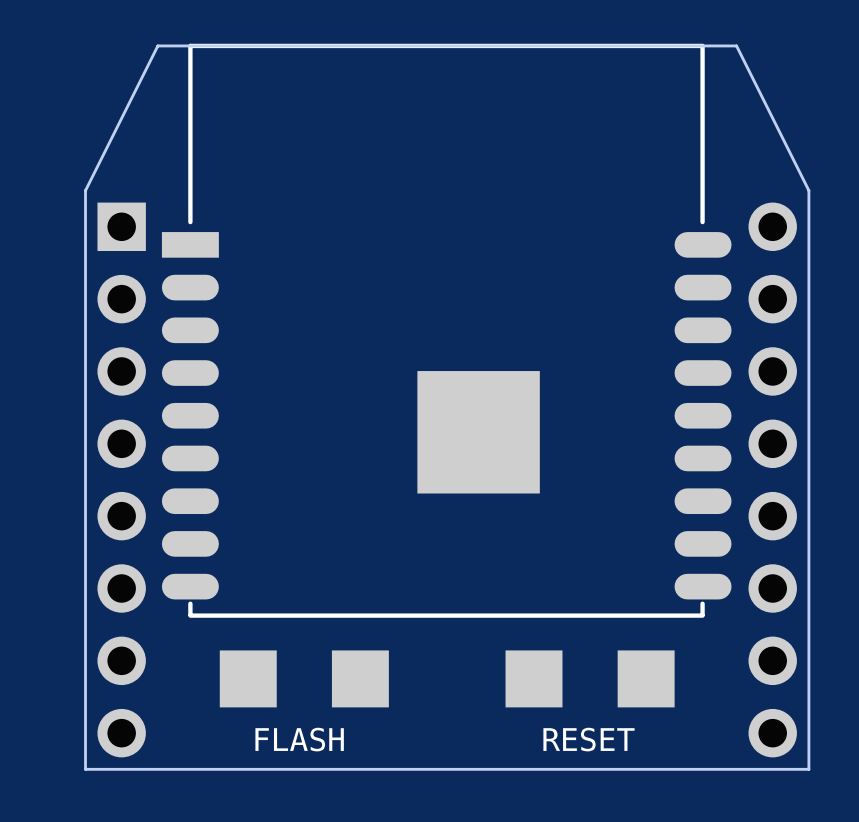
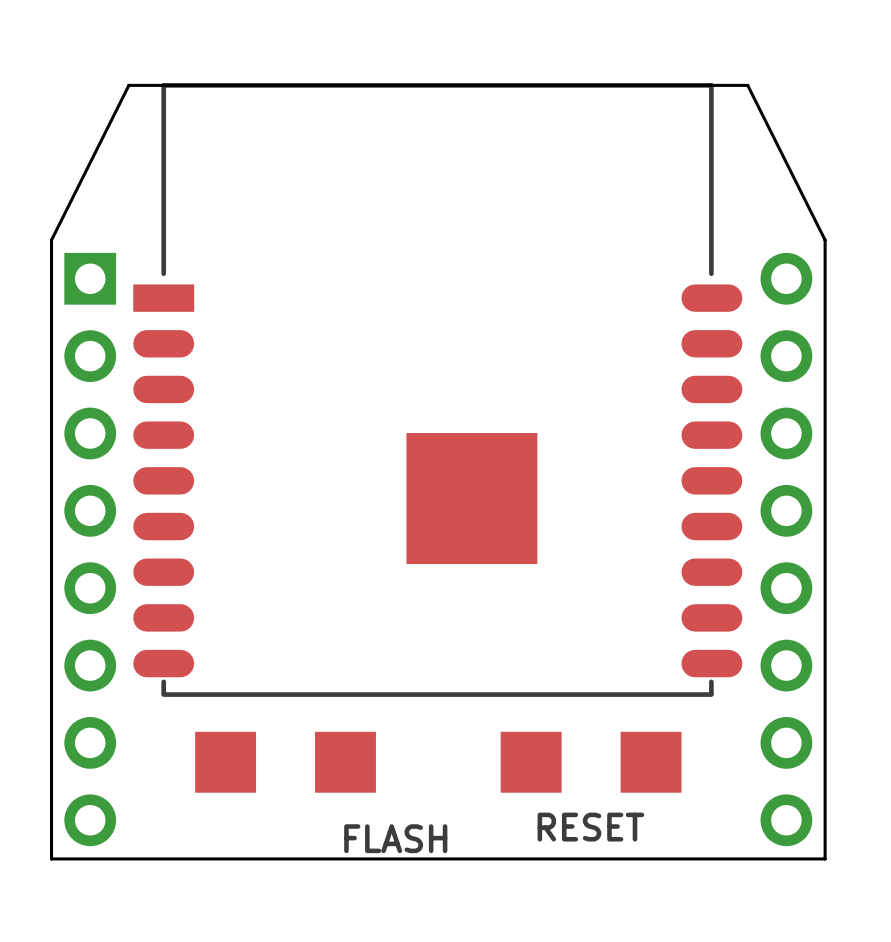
text position: FLASH (299, 739) -> FLASH (395, 838)

